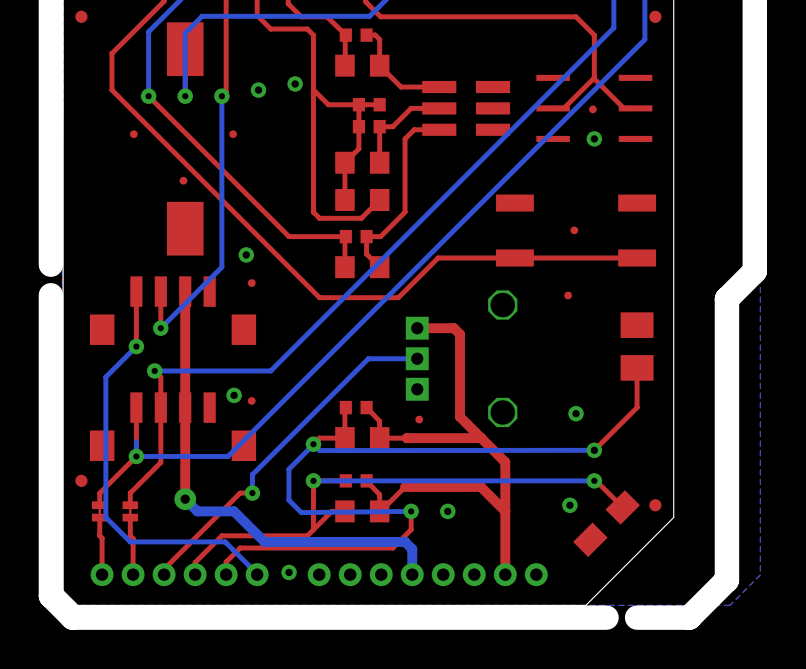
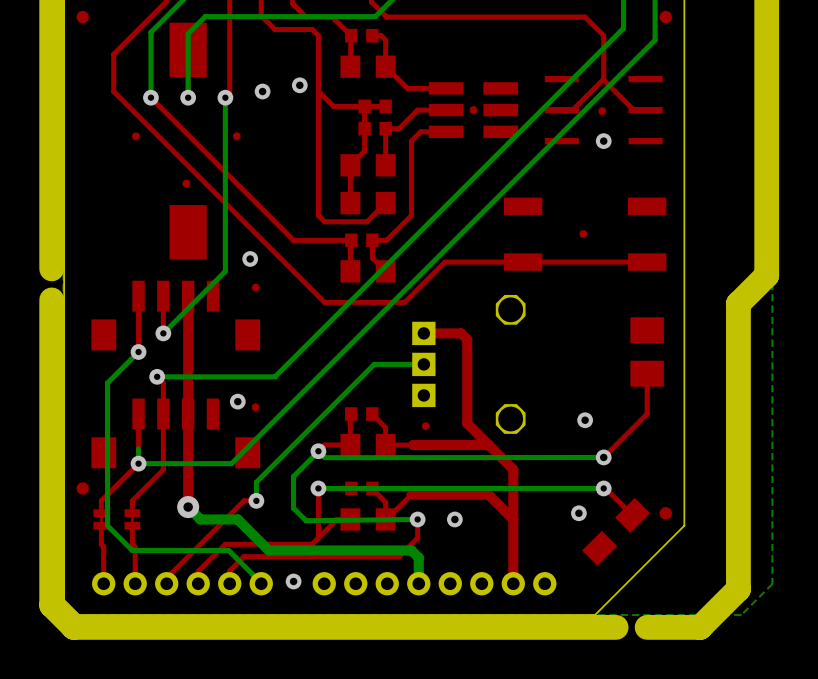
part position: (568, 295) -> (473, 110)

